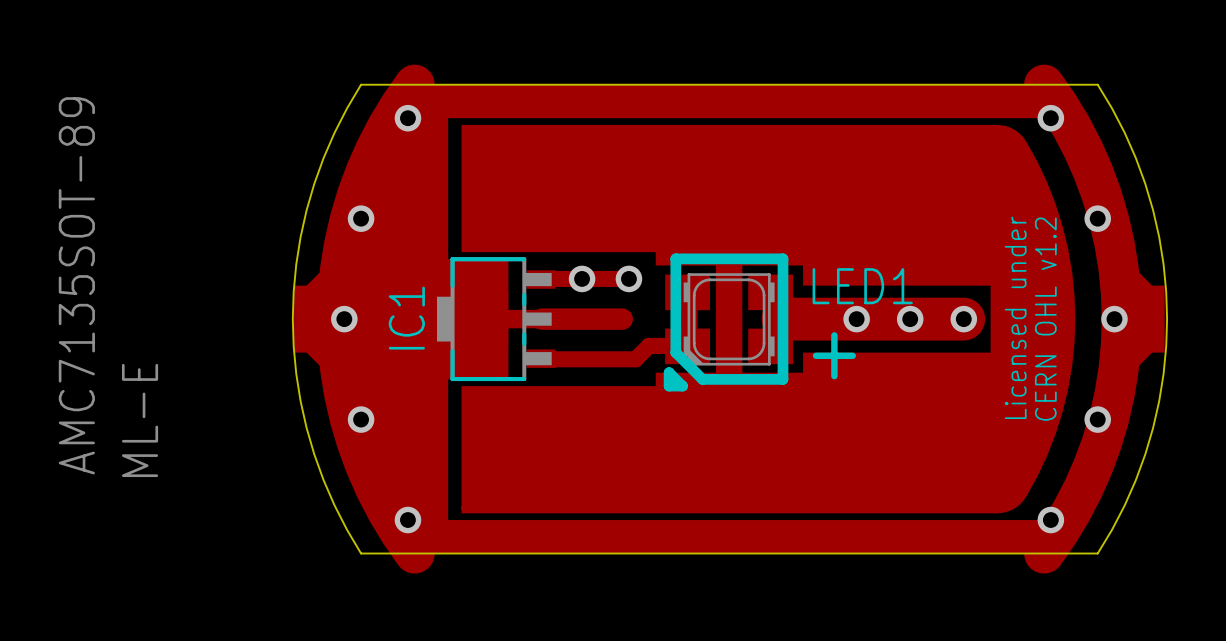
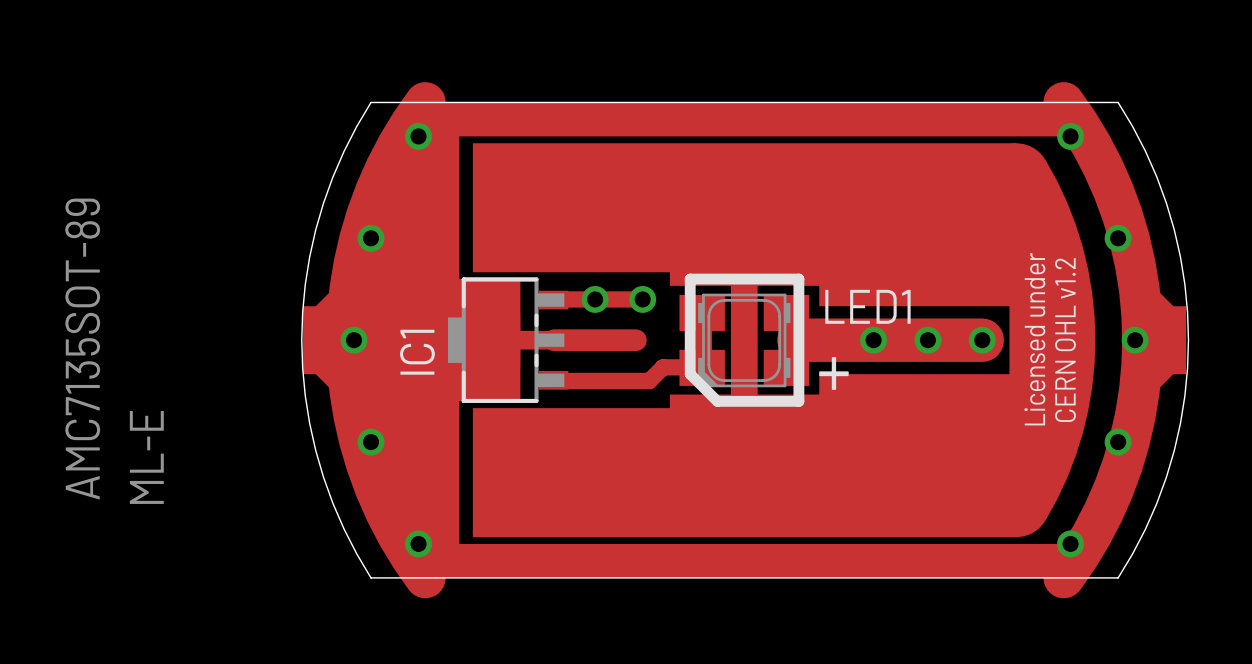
line: (669, 372) (682, 386) (669, 386) (669, 372) -> none

